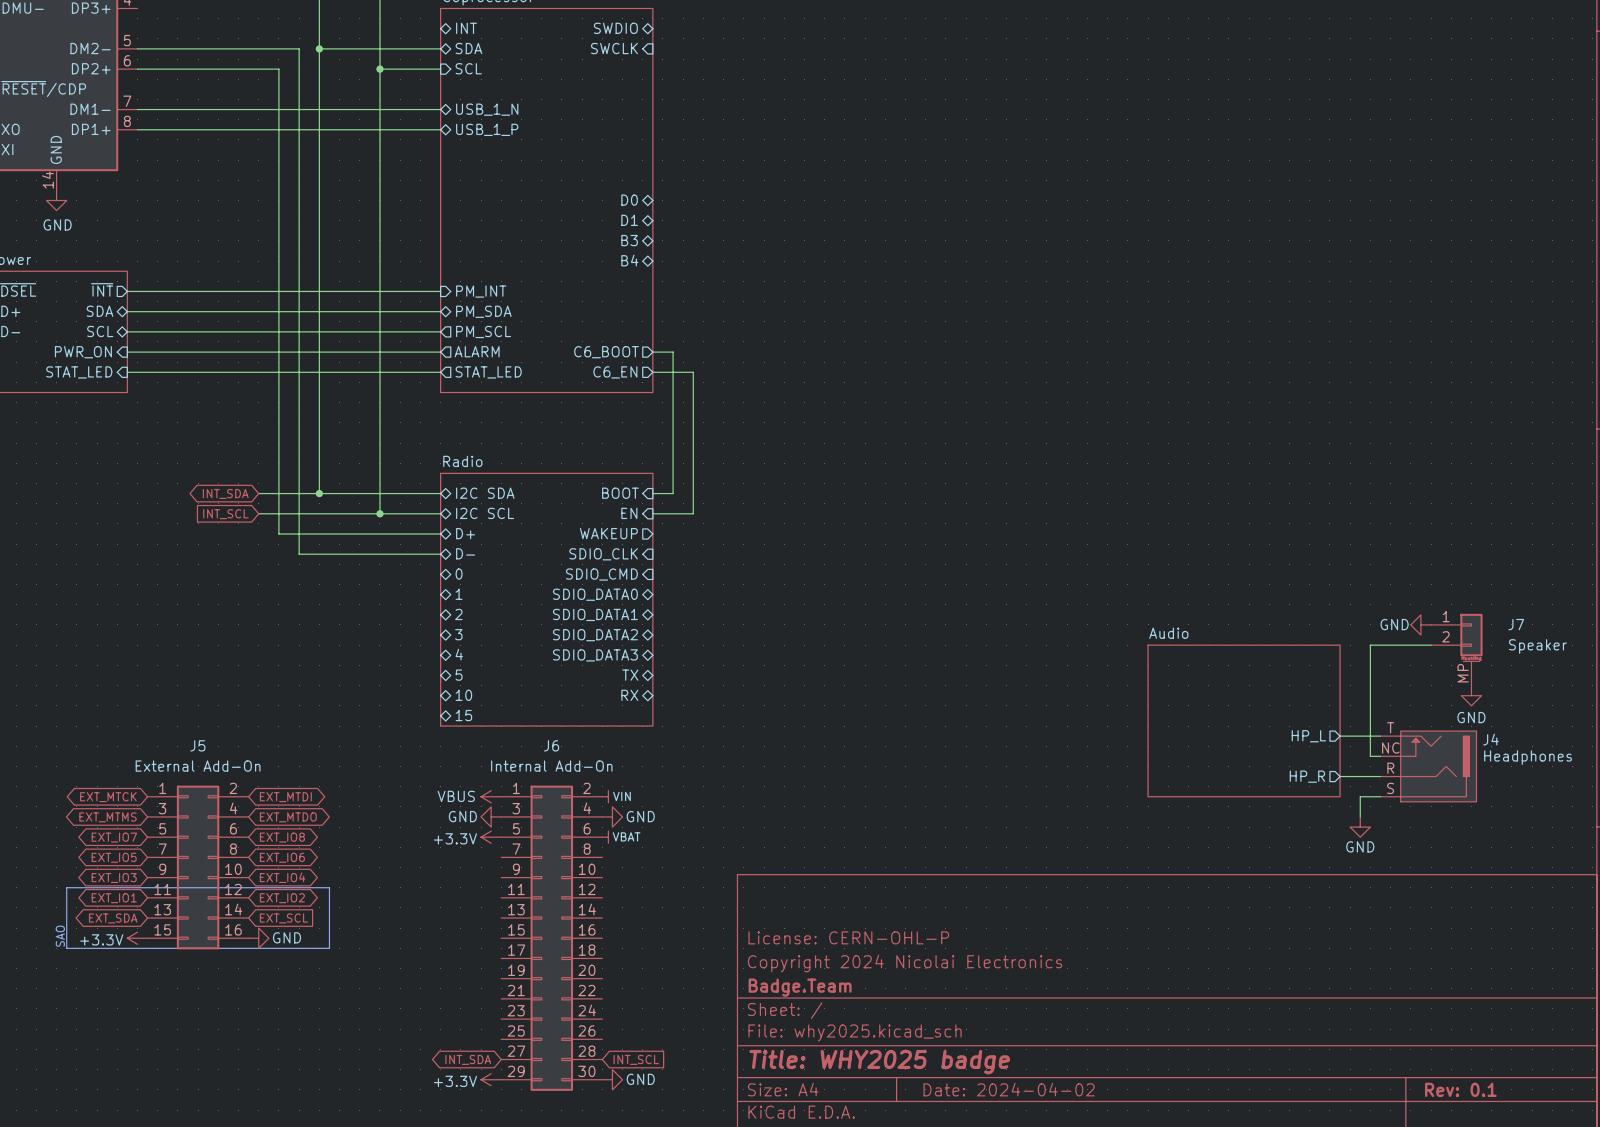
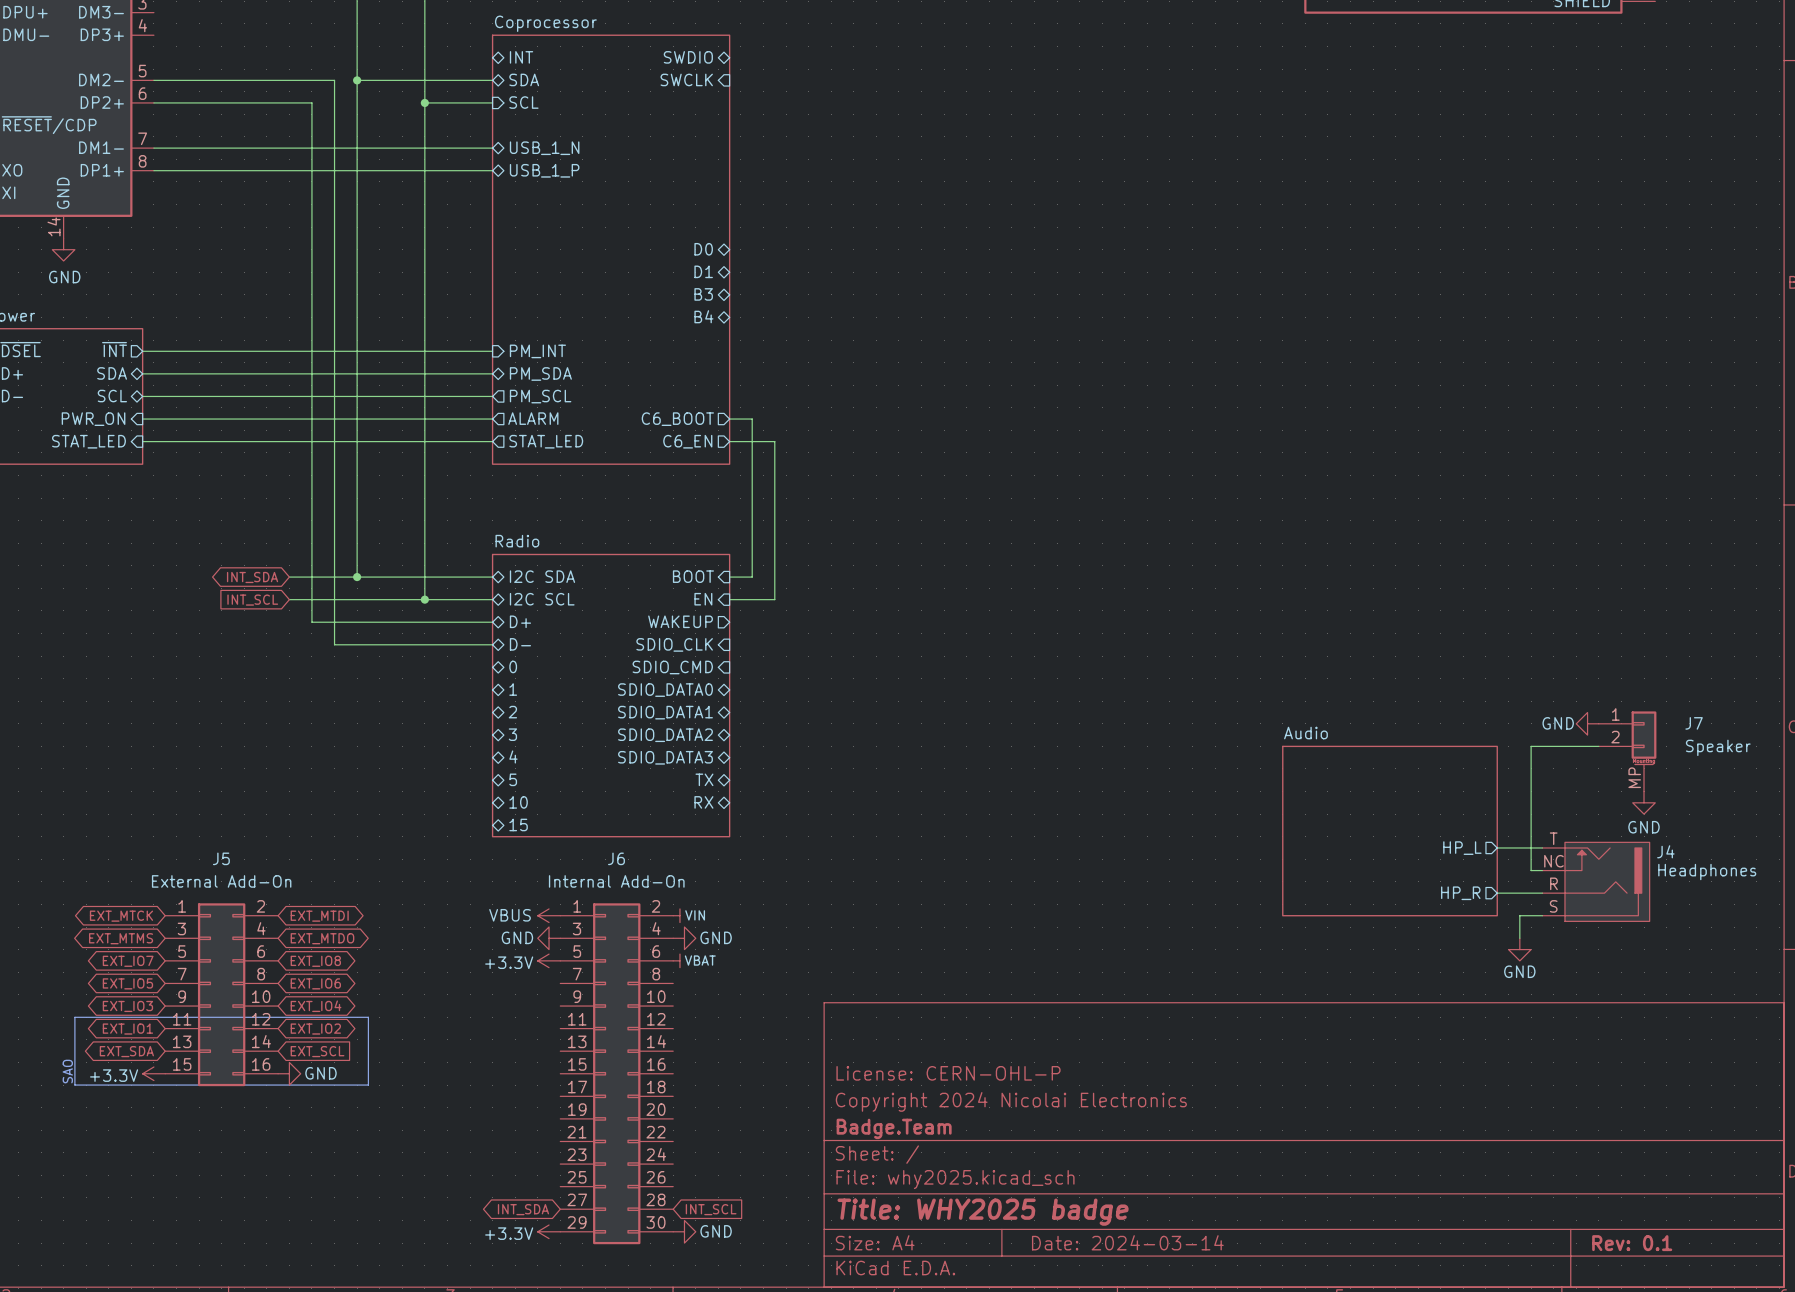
title block: Date: 2024-04-02 (1009, 1089) -> Date: 2024-03-14 (1127, 1242)

